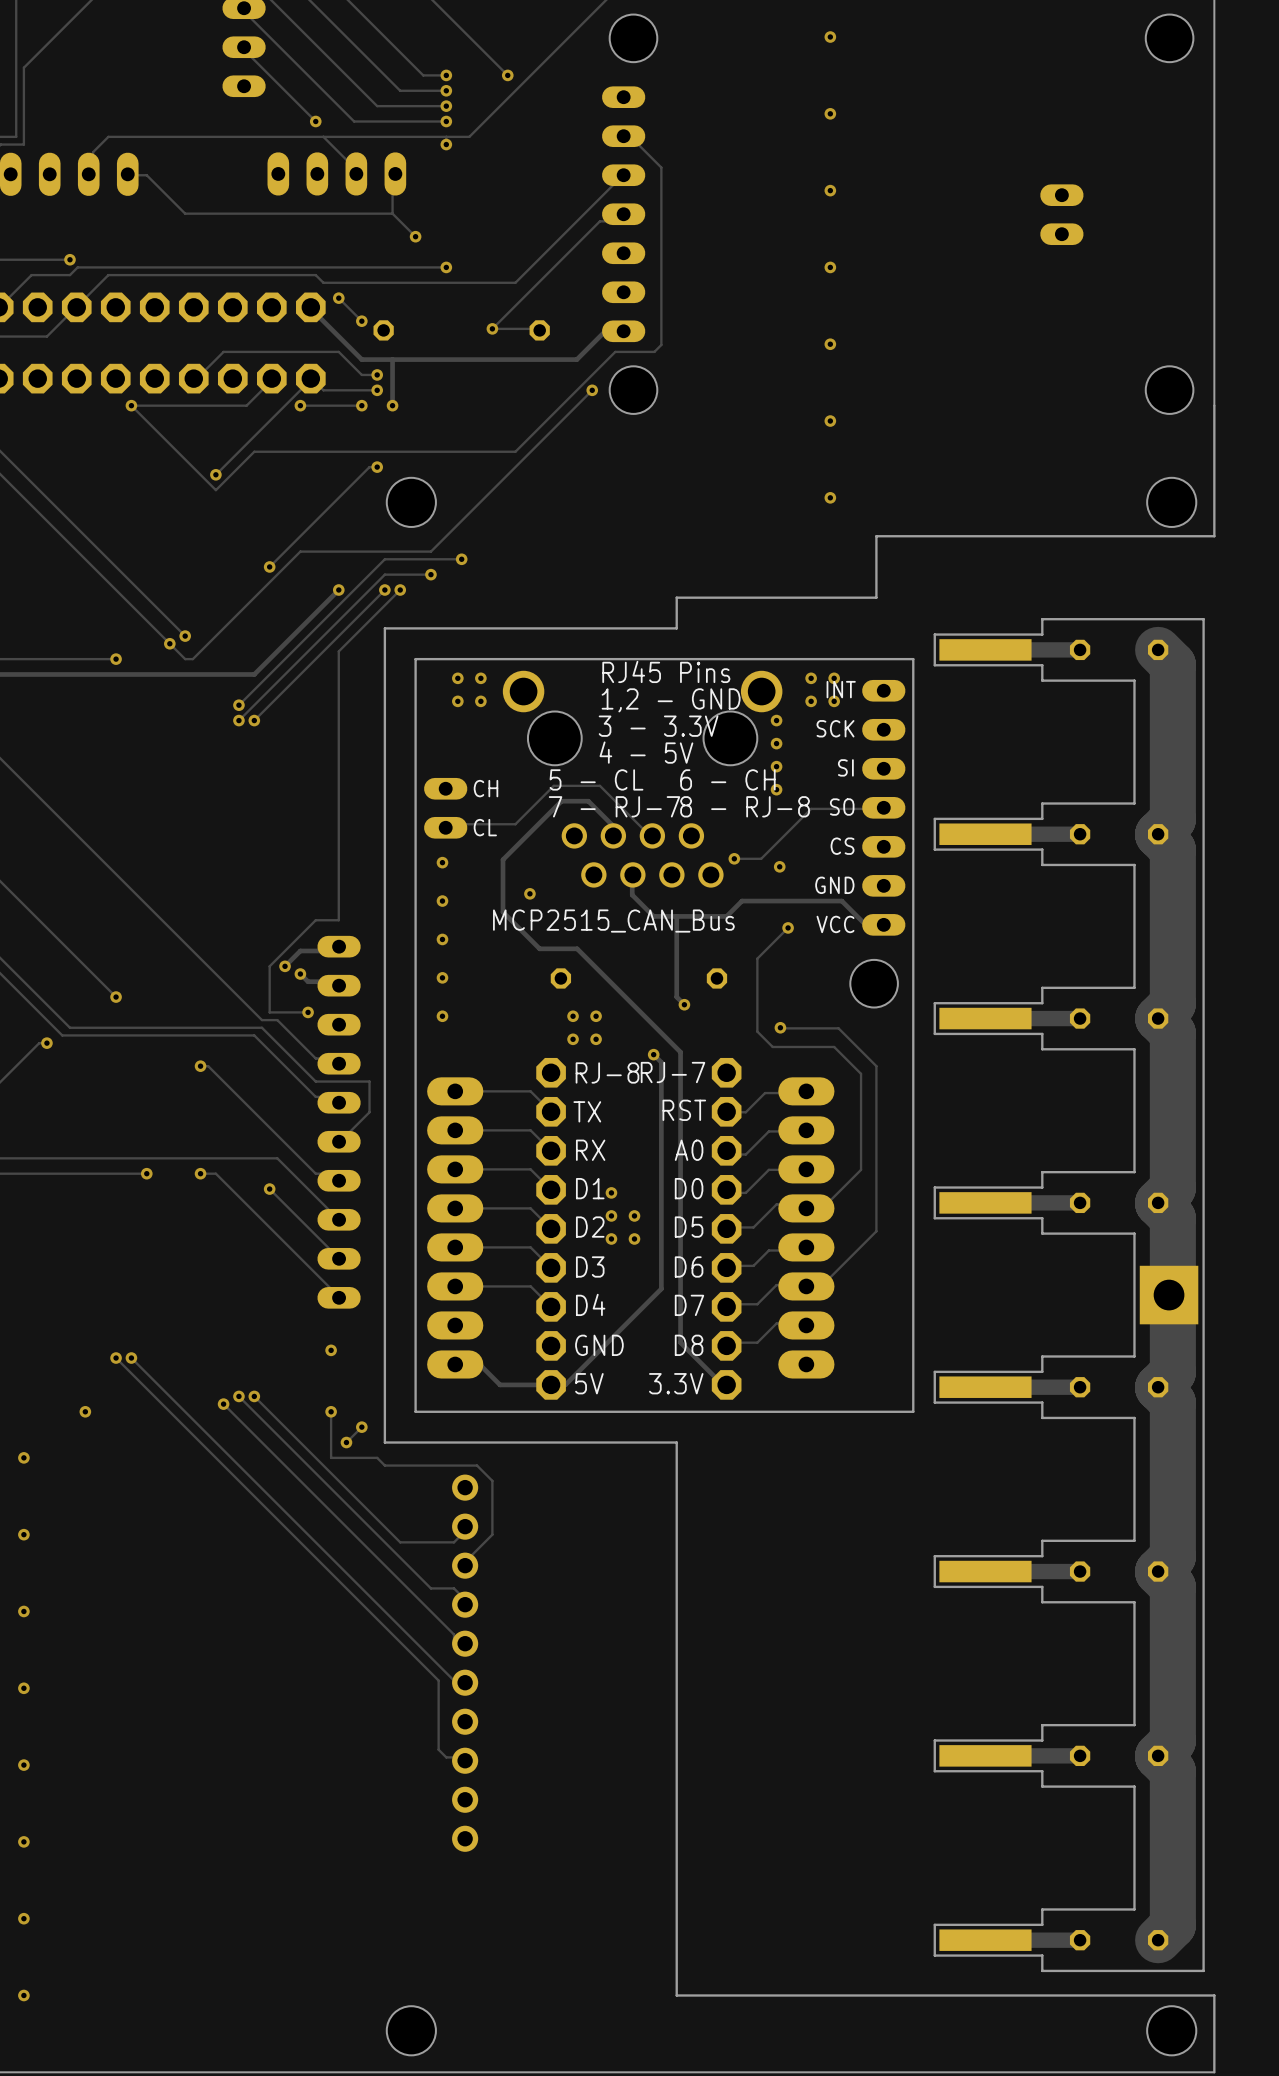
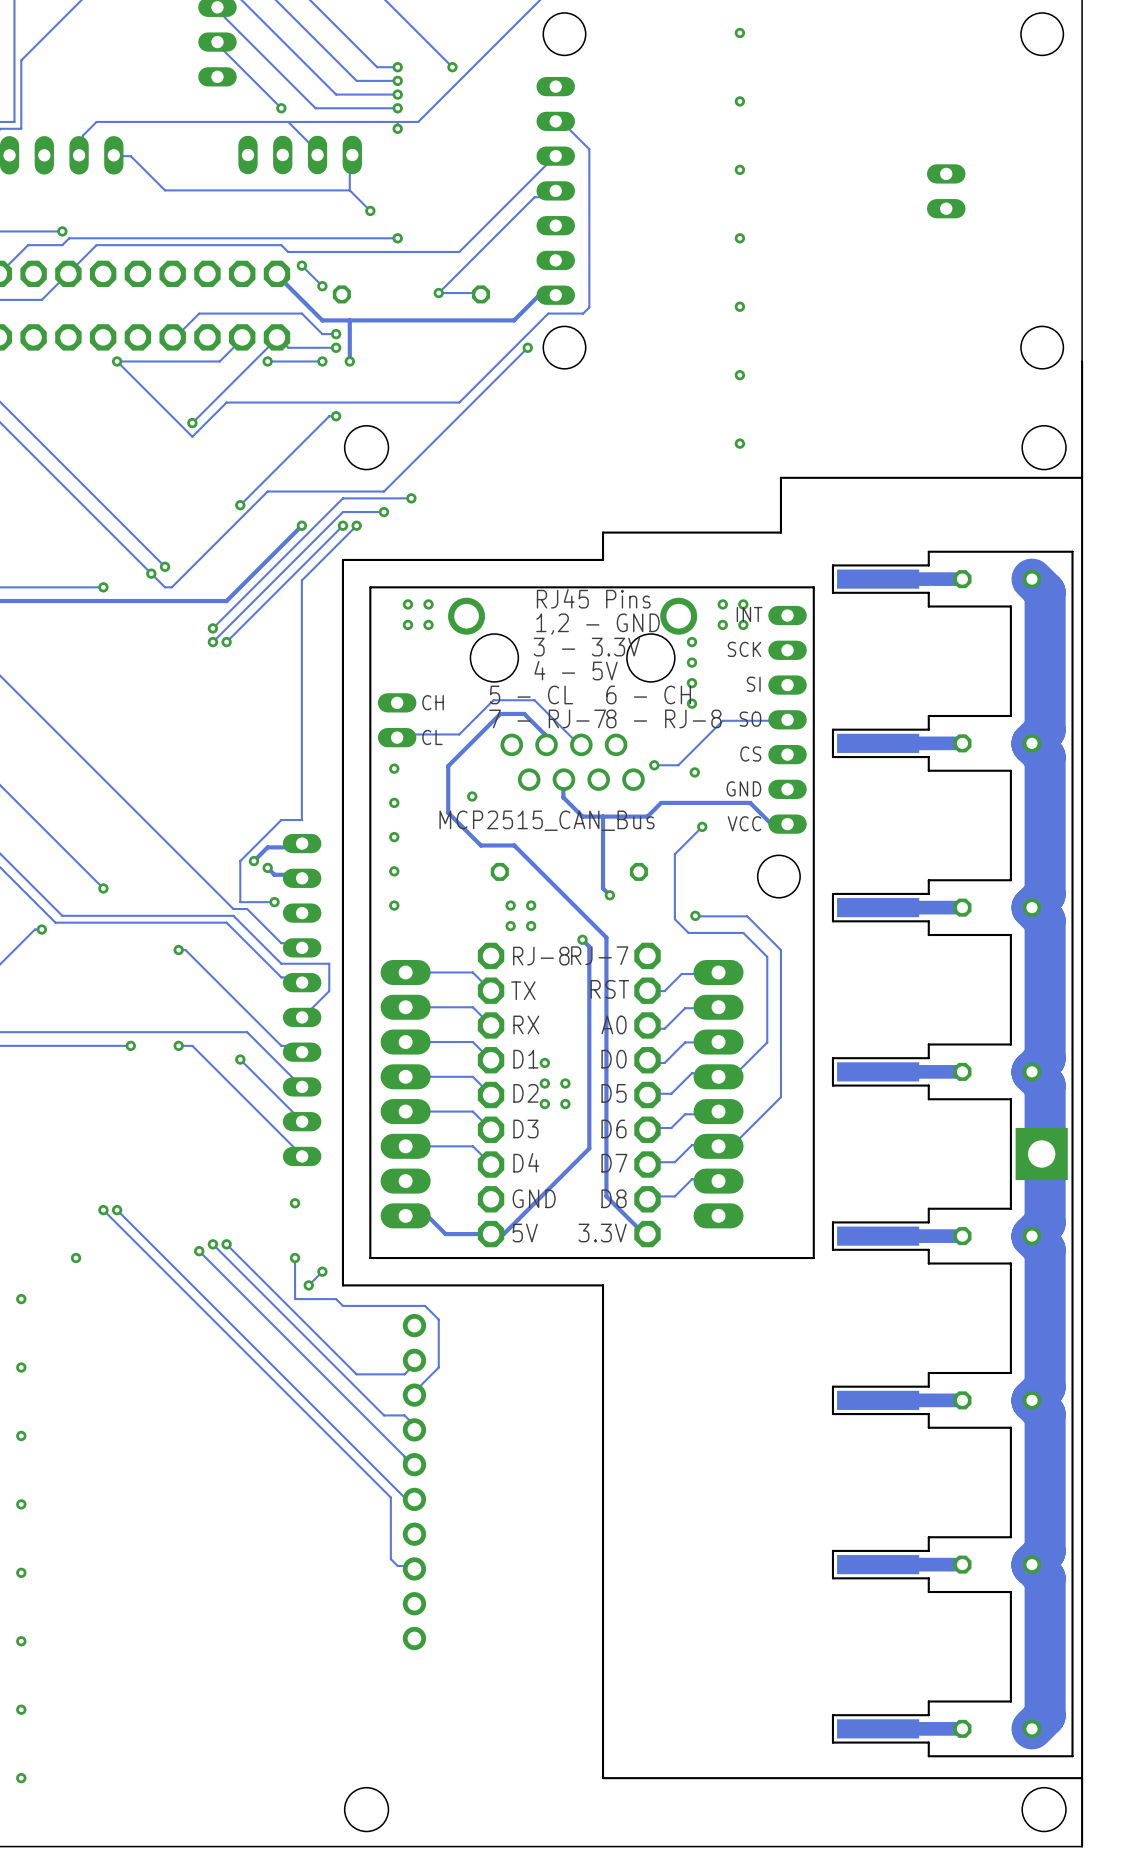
board edge: none -> (1082, 477) (1082, 1778)

